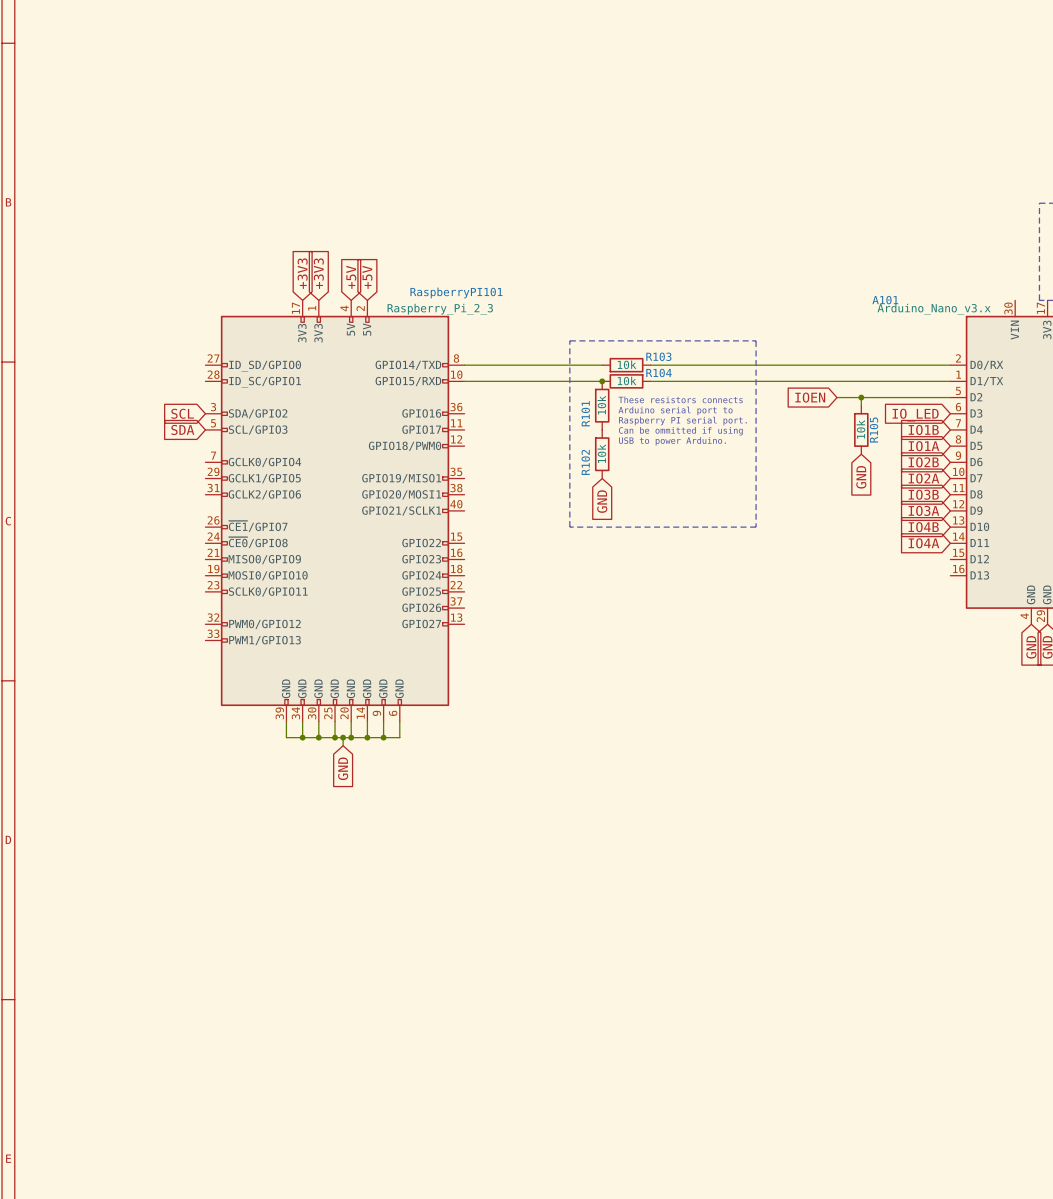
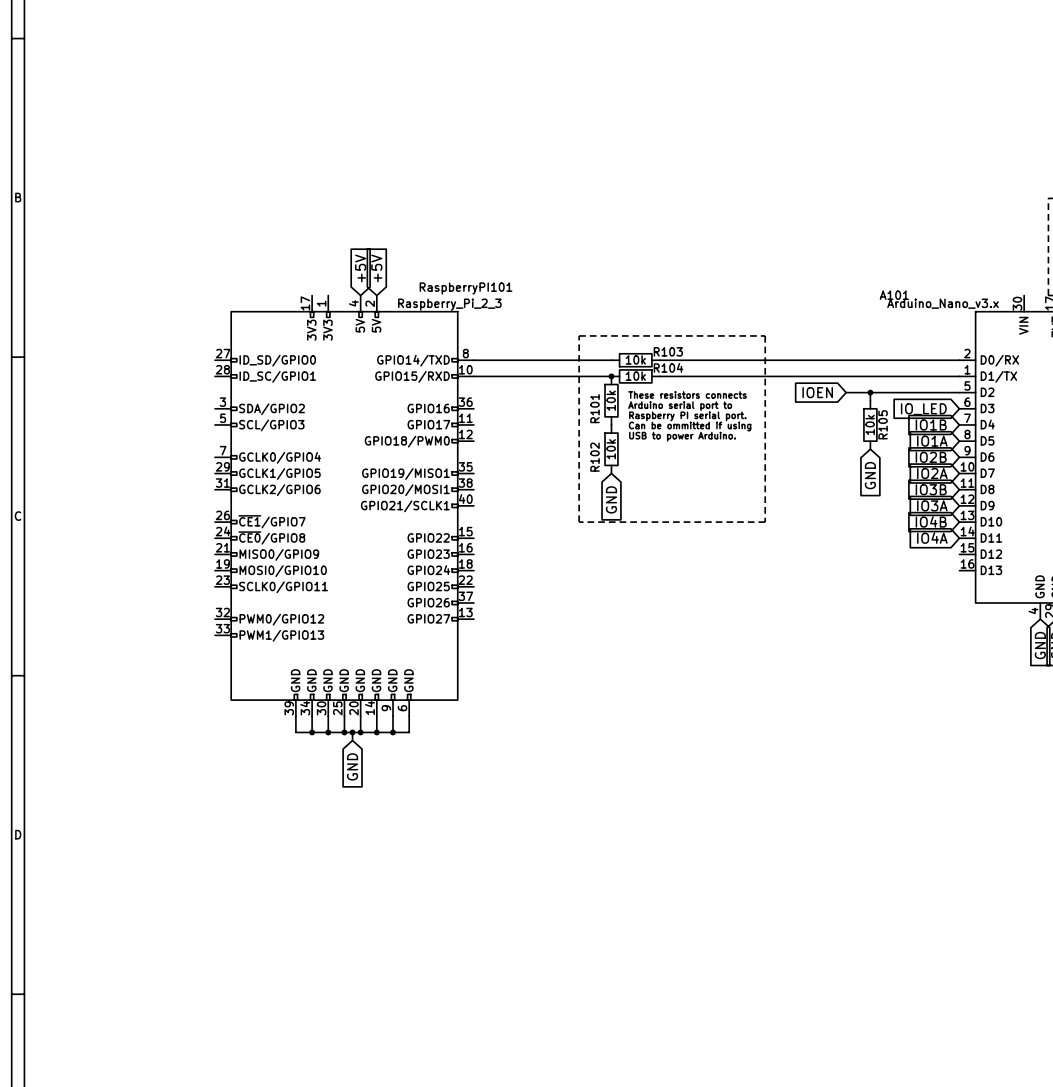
global label: +3V3 (302, 273) -> none
global label: +3V3 (318, 273) -> none
global label: SCL (182, 413) -> none
global label: SDA (182, 429) -> none

